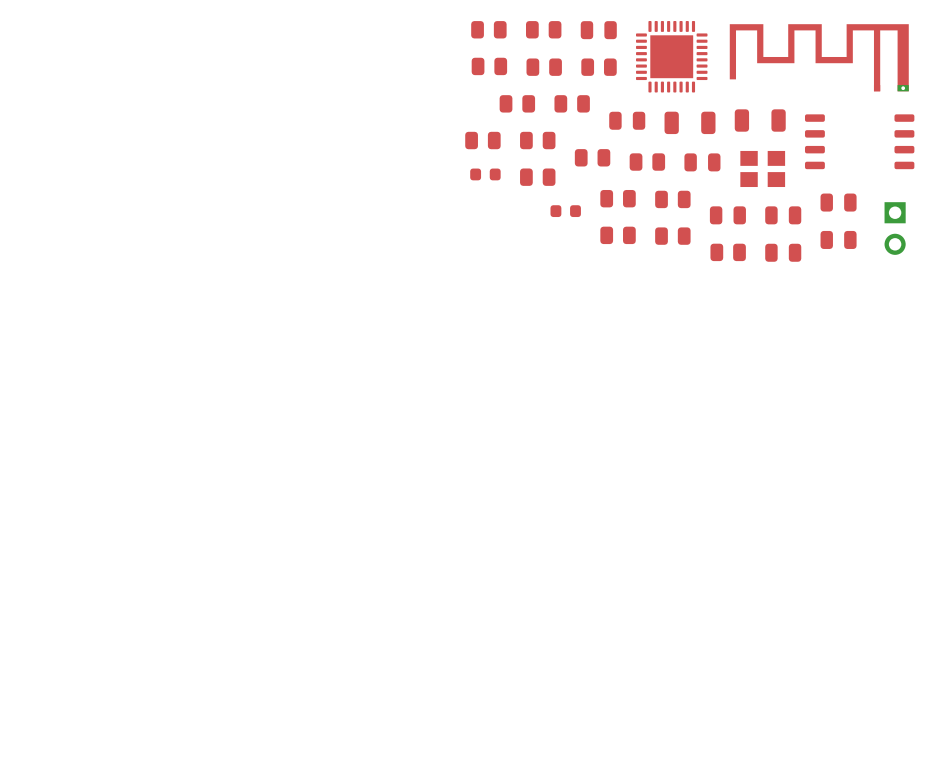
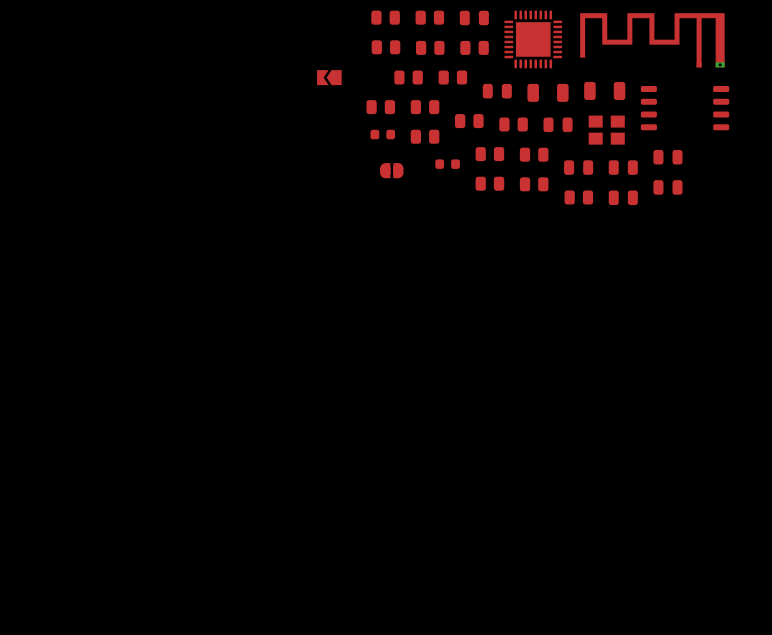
part: none -> (329, 77)
part: none -> (391, 170)
part: (895, 228) -> none

